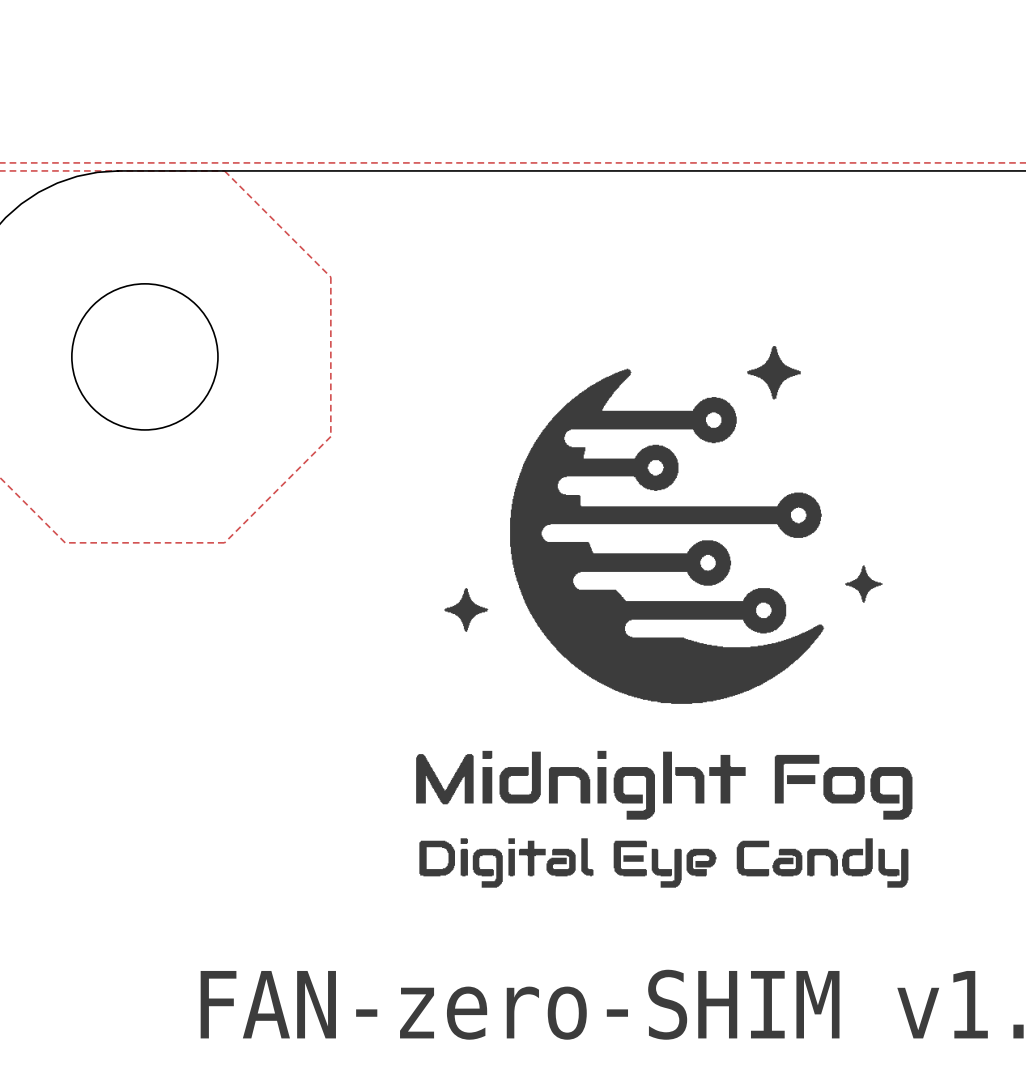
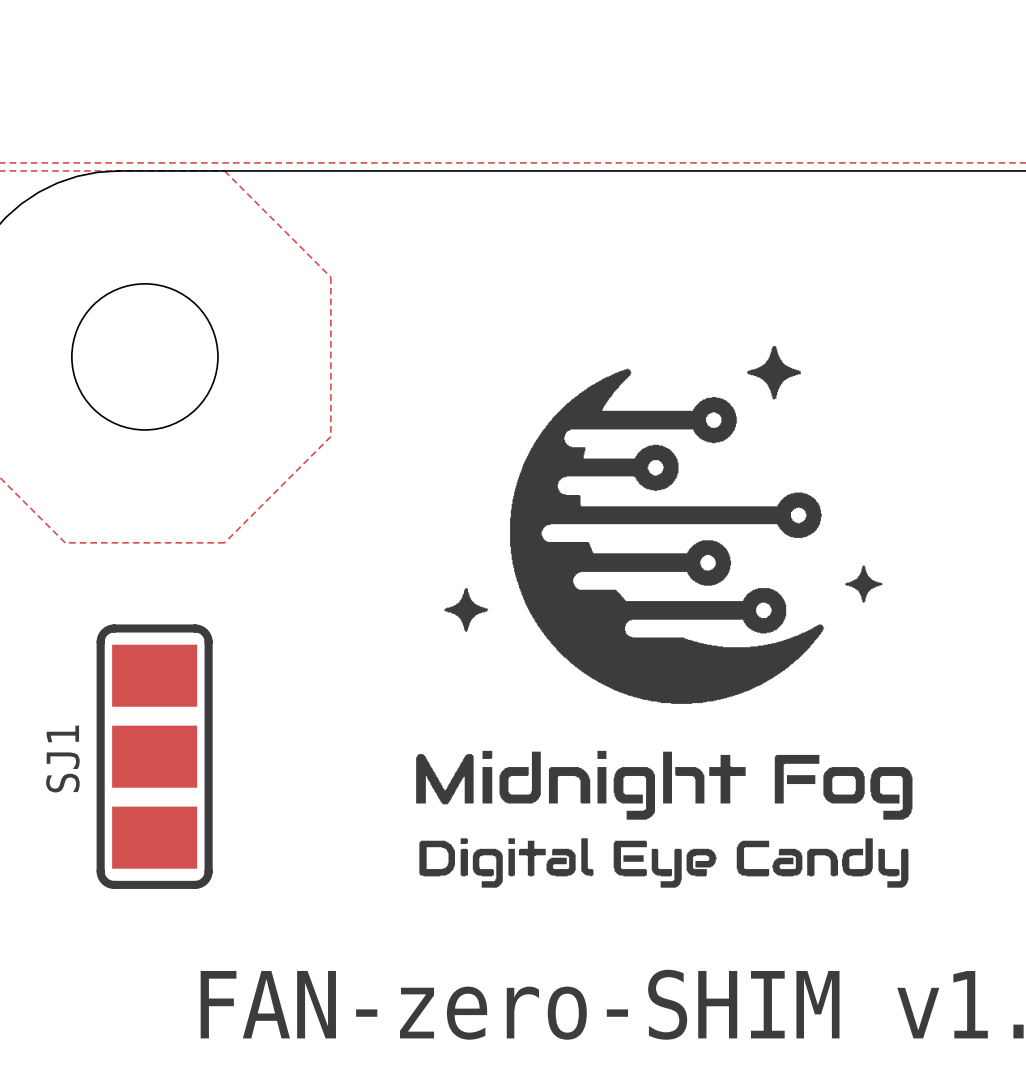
SJ1: none -> (154, 756)

